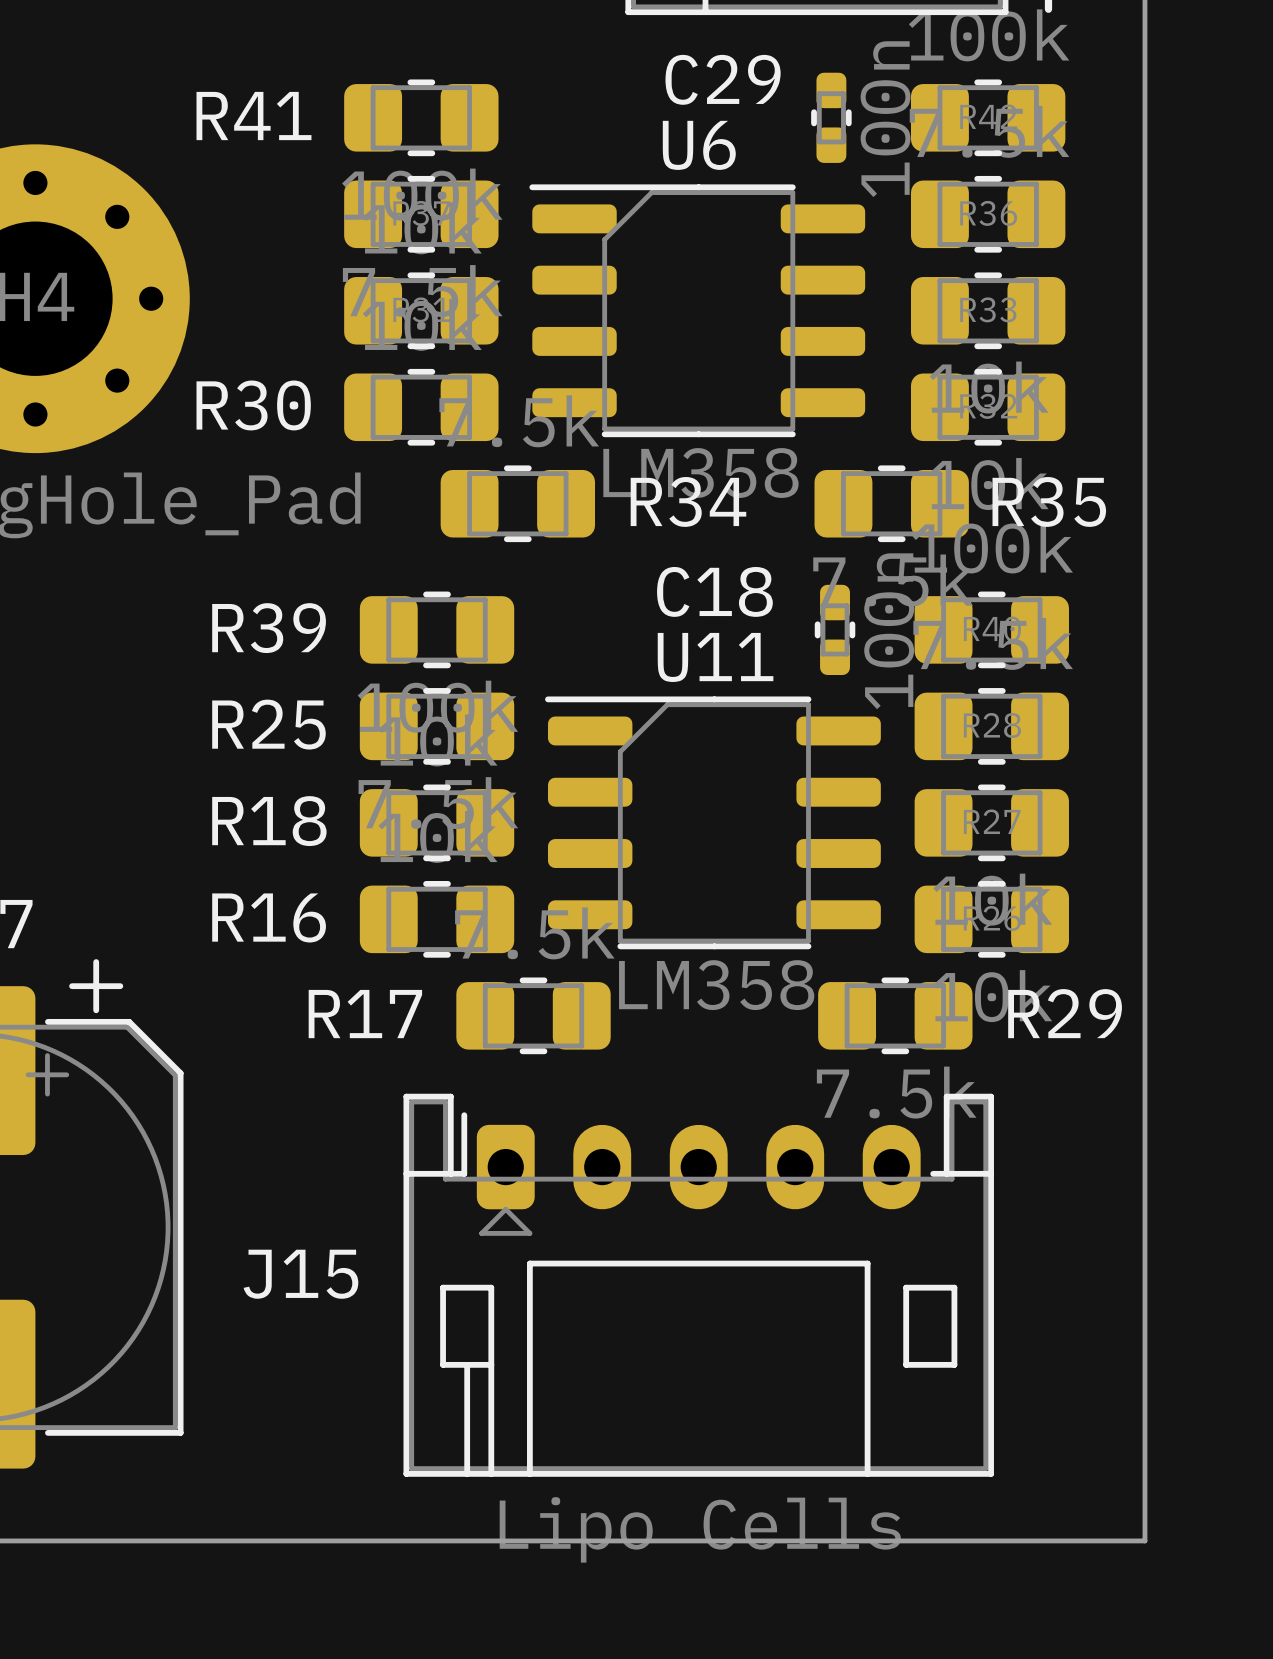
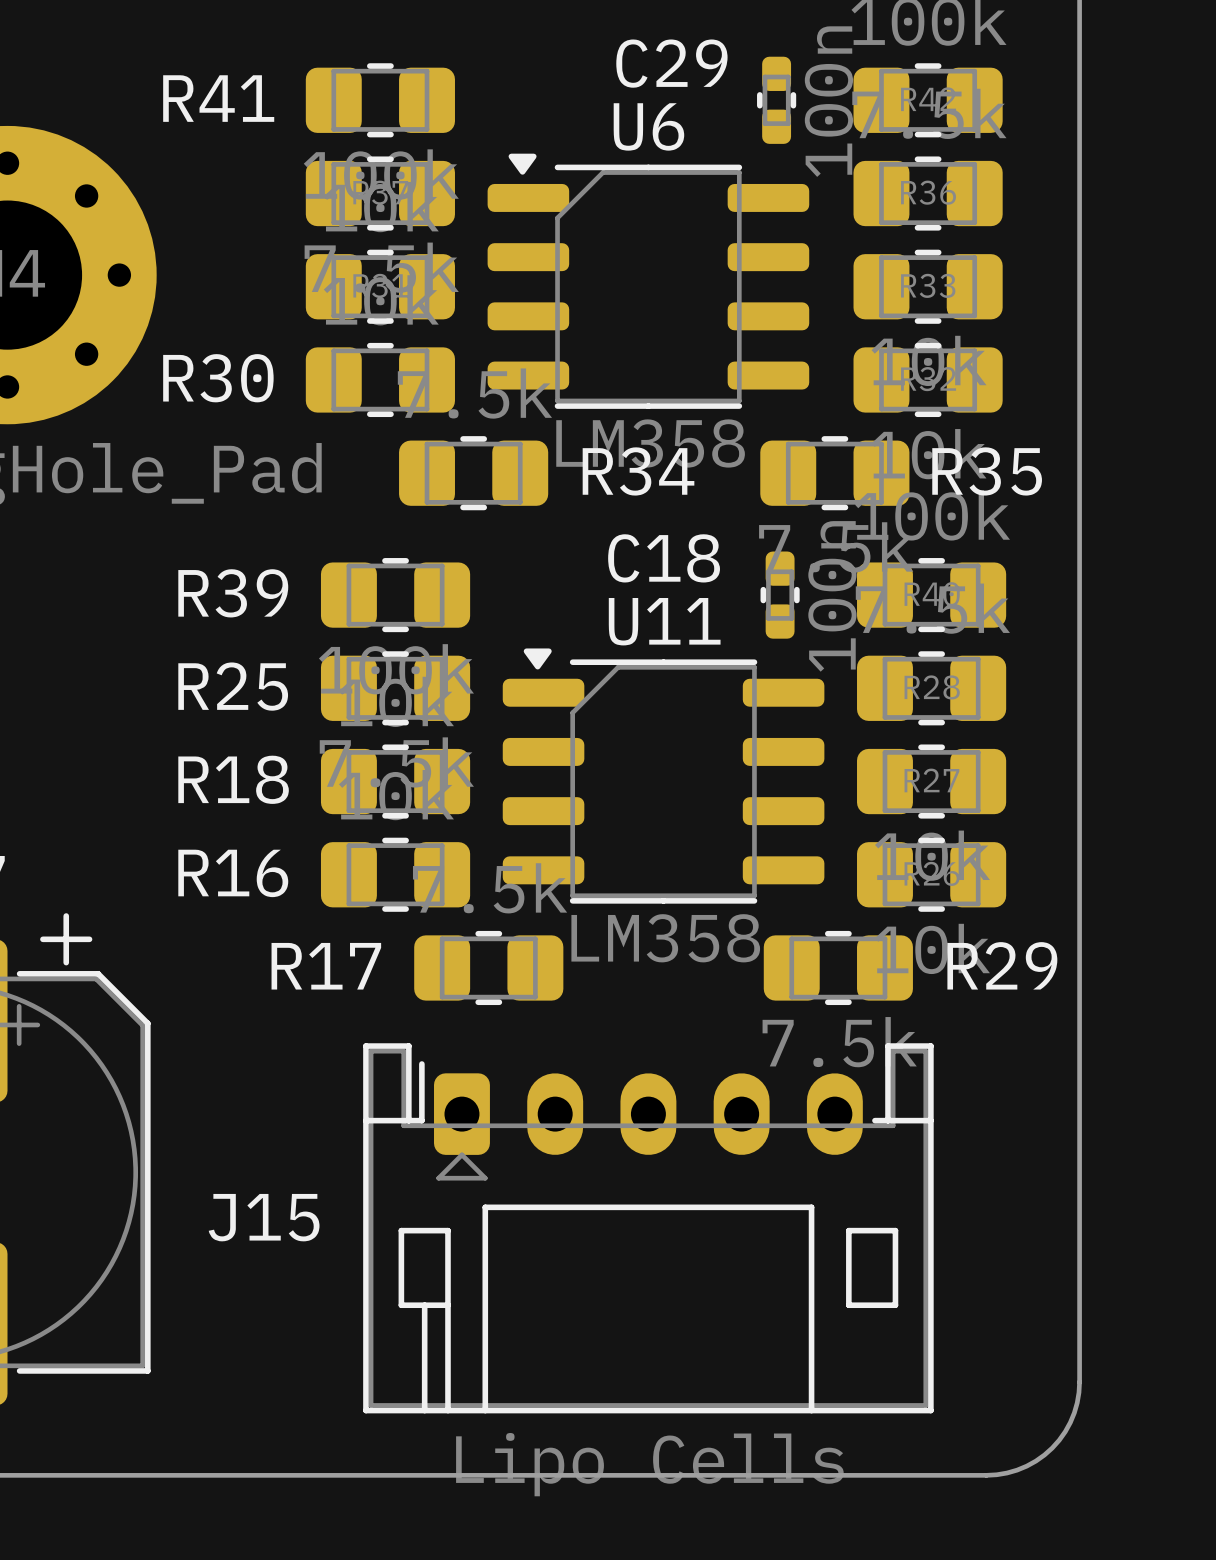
U6 footprint: [529, 184, 866, 438] -> [487, 153, 810, 409]
U11 footprint: [545, 696, 881, 950] -> [502, 648, 825, 904]
board edge: (1144, 1444) (1144, 1540) (1048, 1540) -> (1079, 1382) (1074, 1412) (1065, 1431) (1052, 1448) (1026, 1466) (1007, 1473) (986, 1475)

